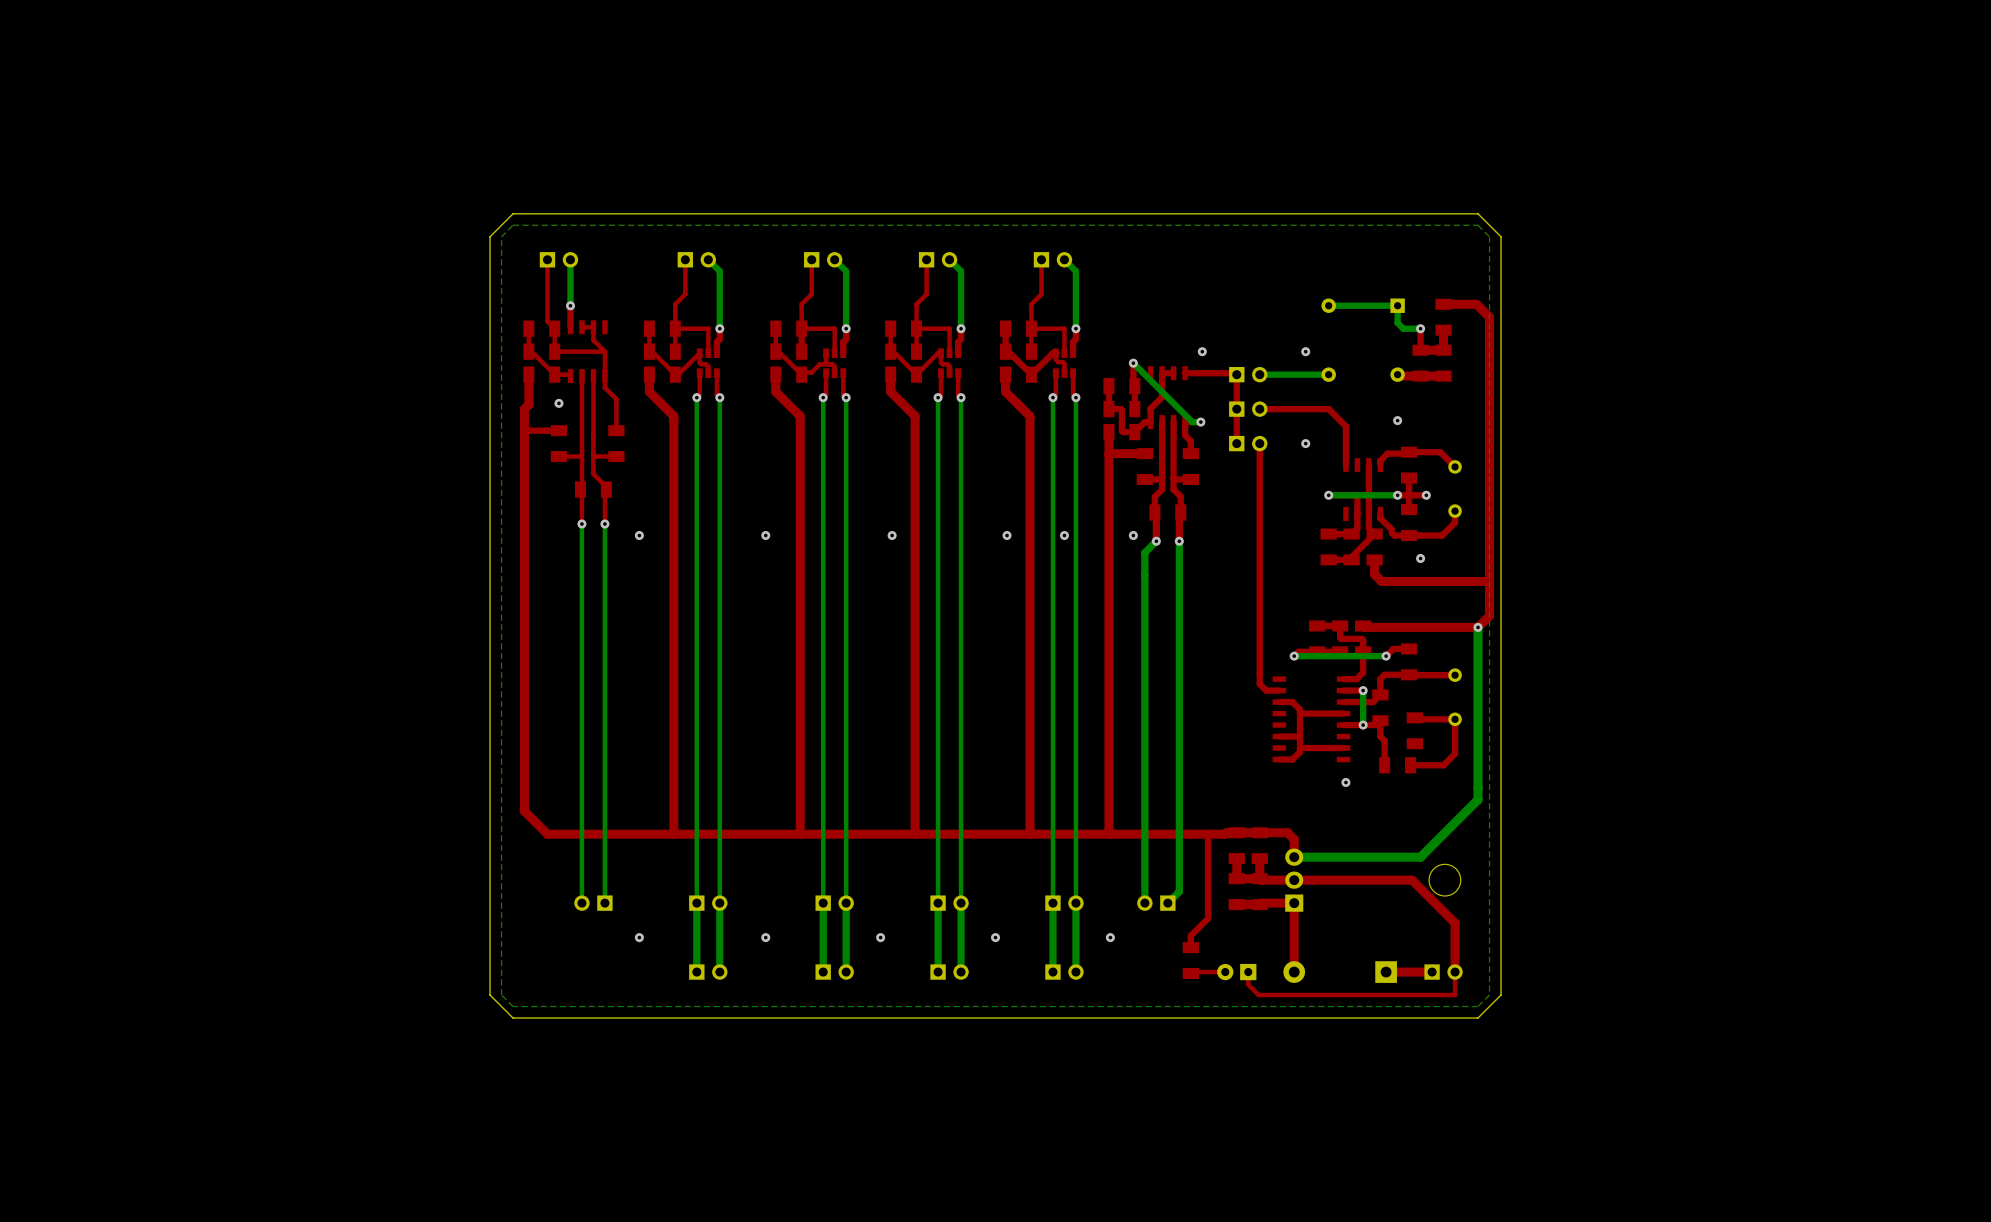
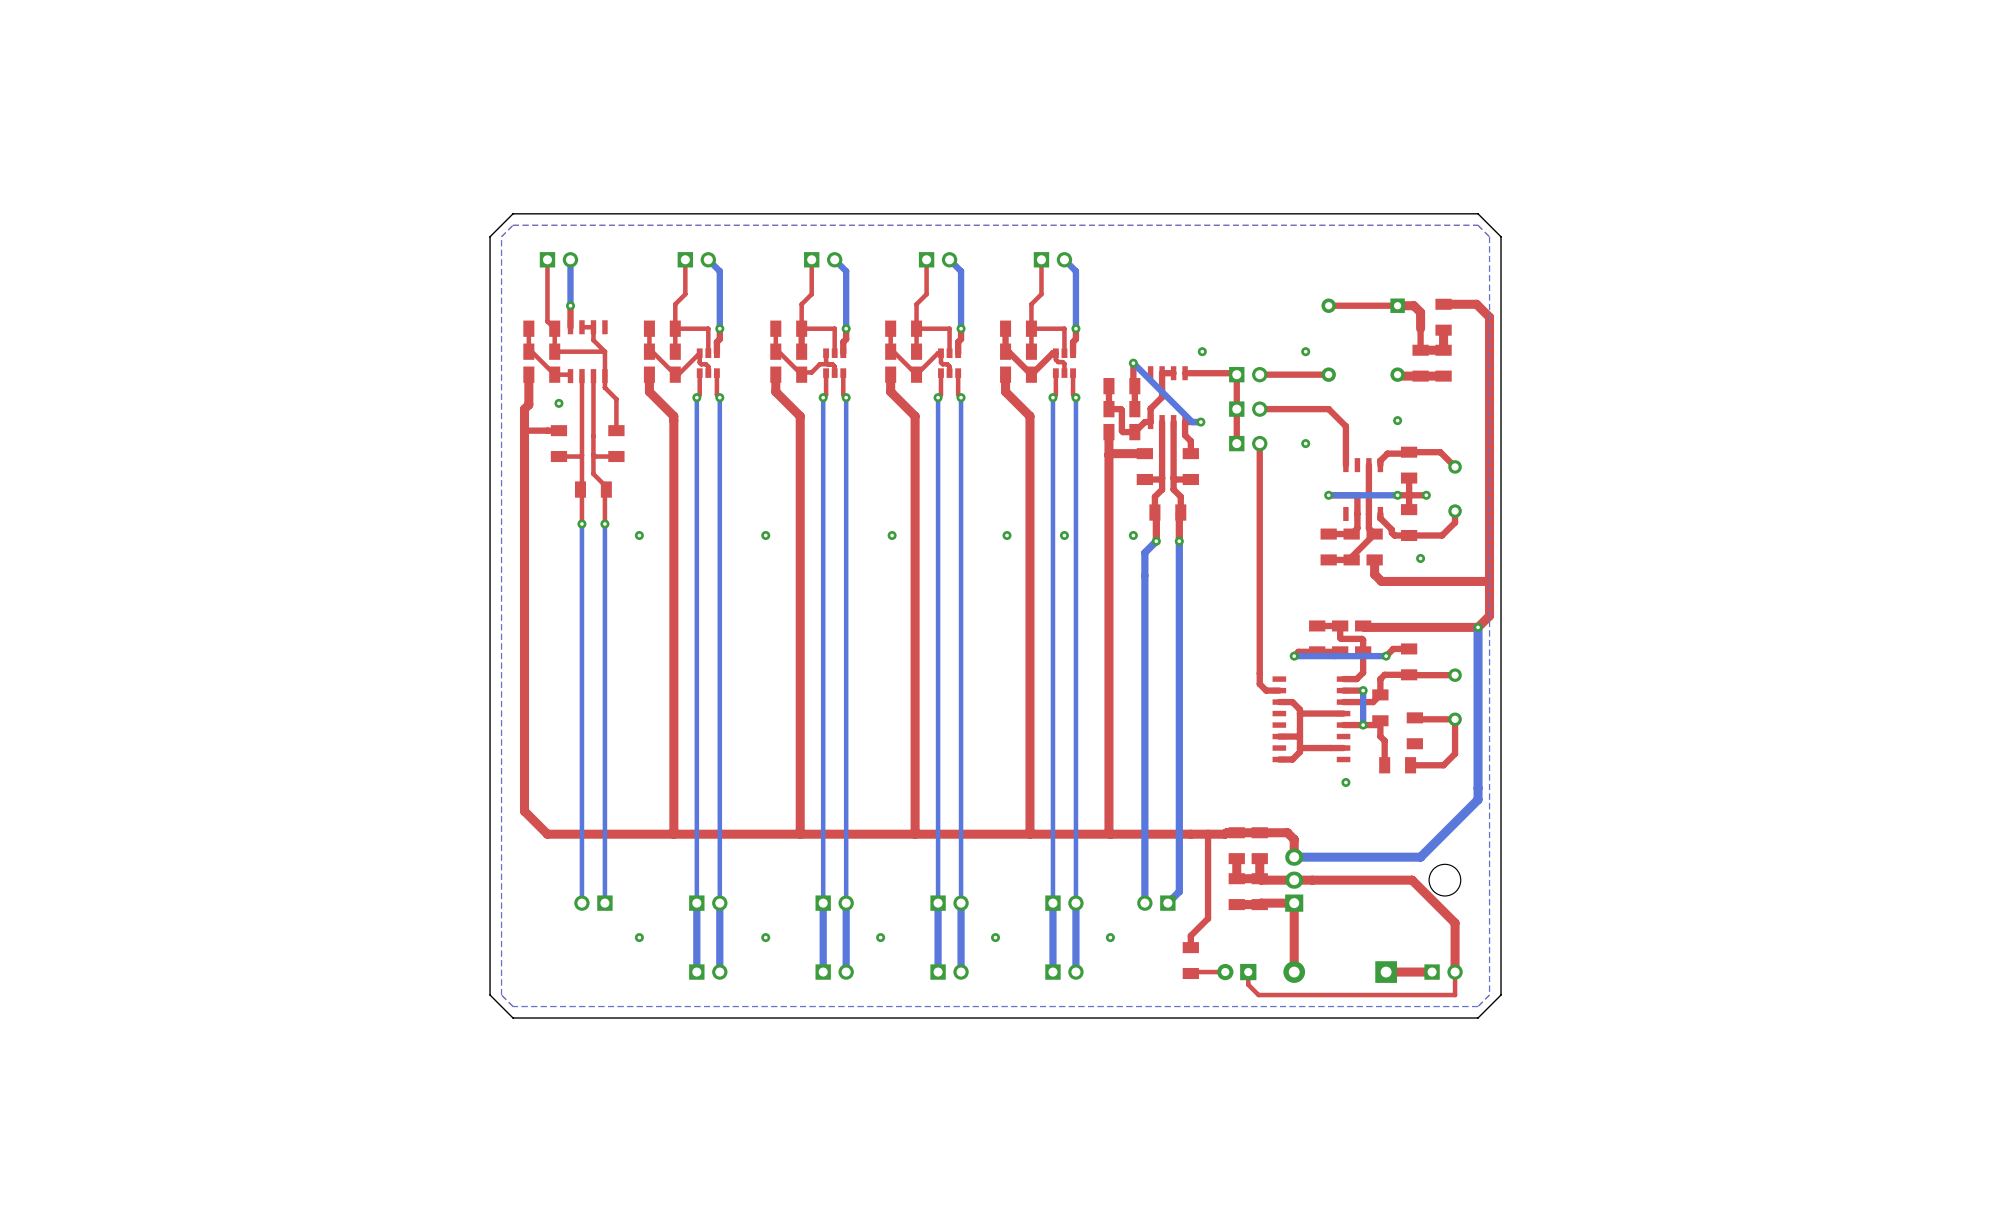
top track: none -> (1328, 305) (1413, 305) (1420, 312) (1420, 328)
bottom track: (1328, 305) (1397, 305) (1397, 322) (1403, 328) (1420, 328) -> none
via: (1420, 328) -> none
top track: none -> (1328, 374) (1259, 374)
bottom track: (1328, 374) (1259, 374) -> none

